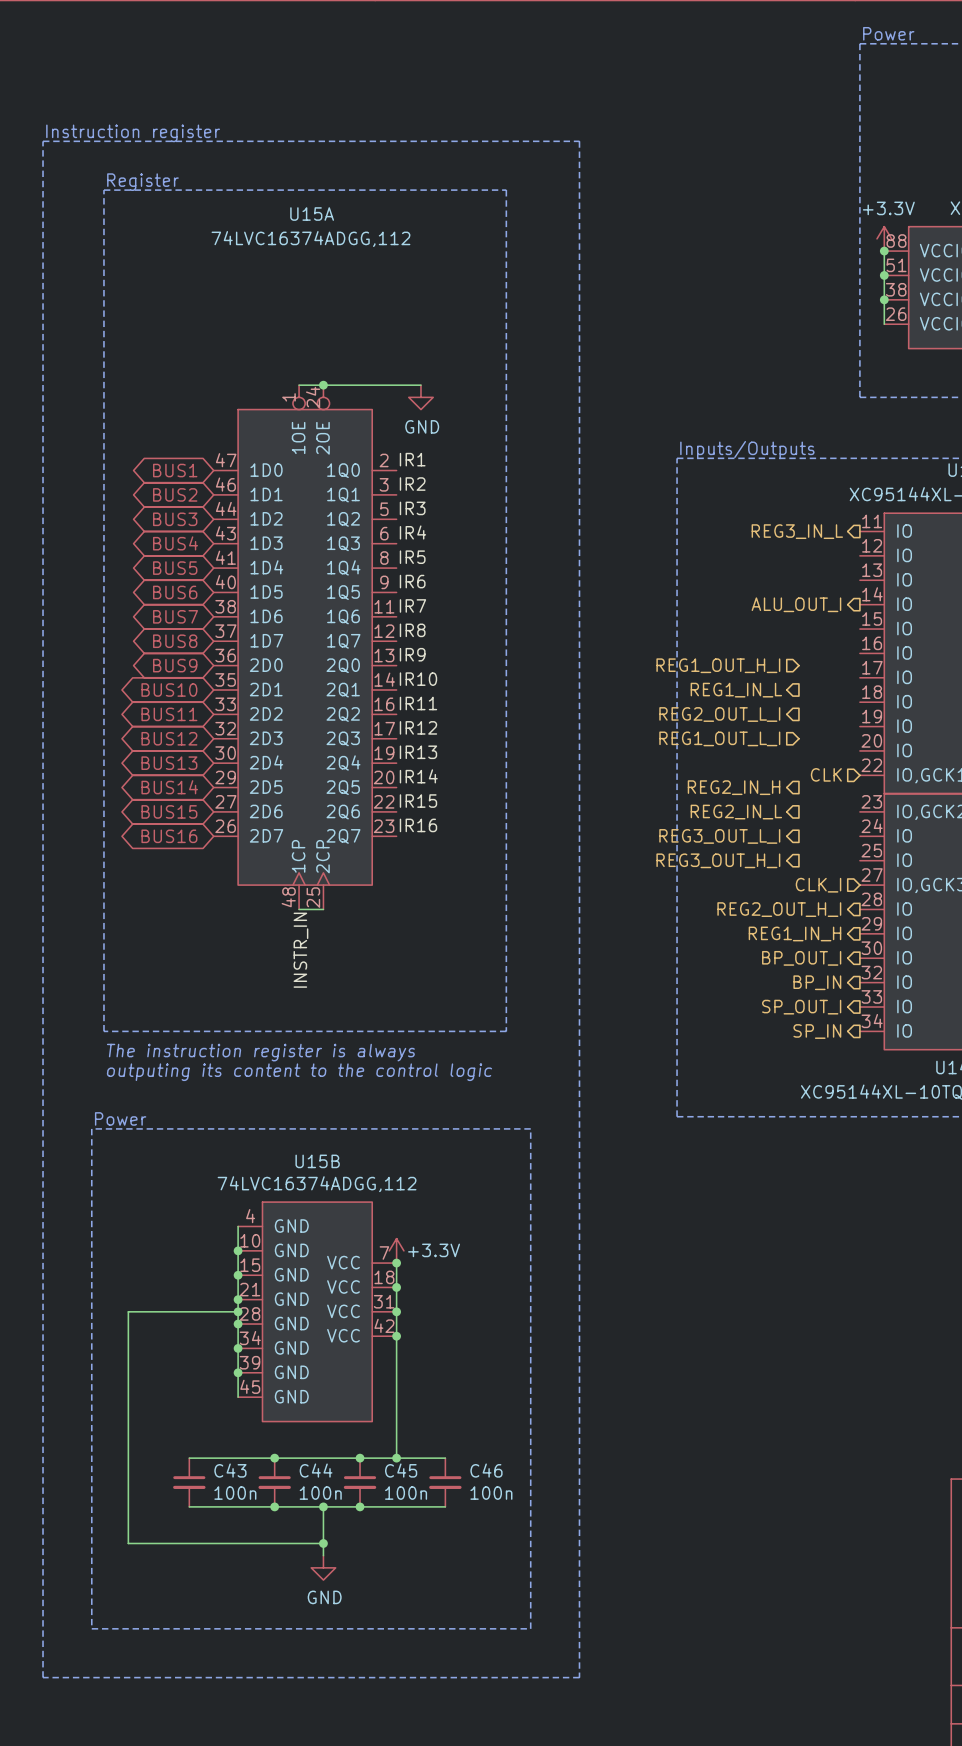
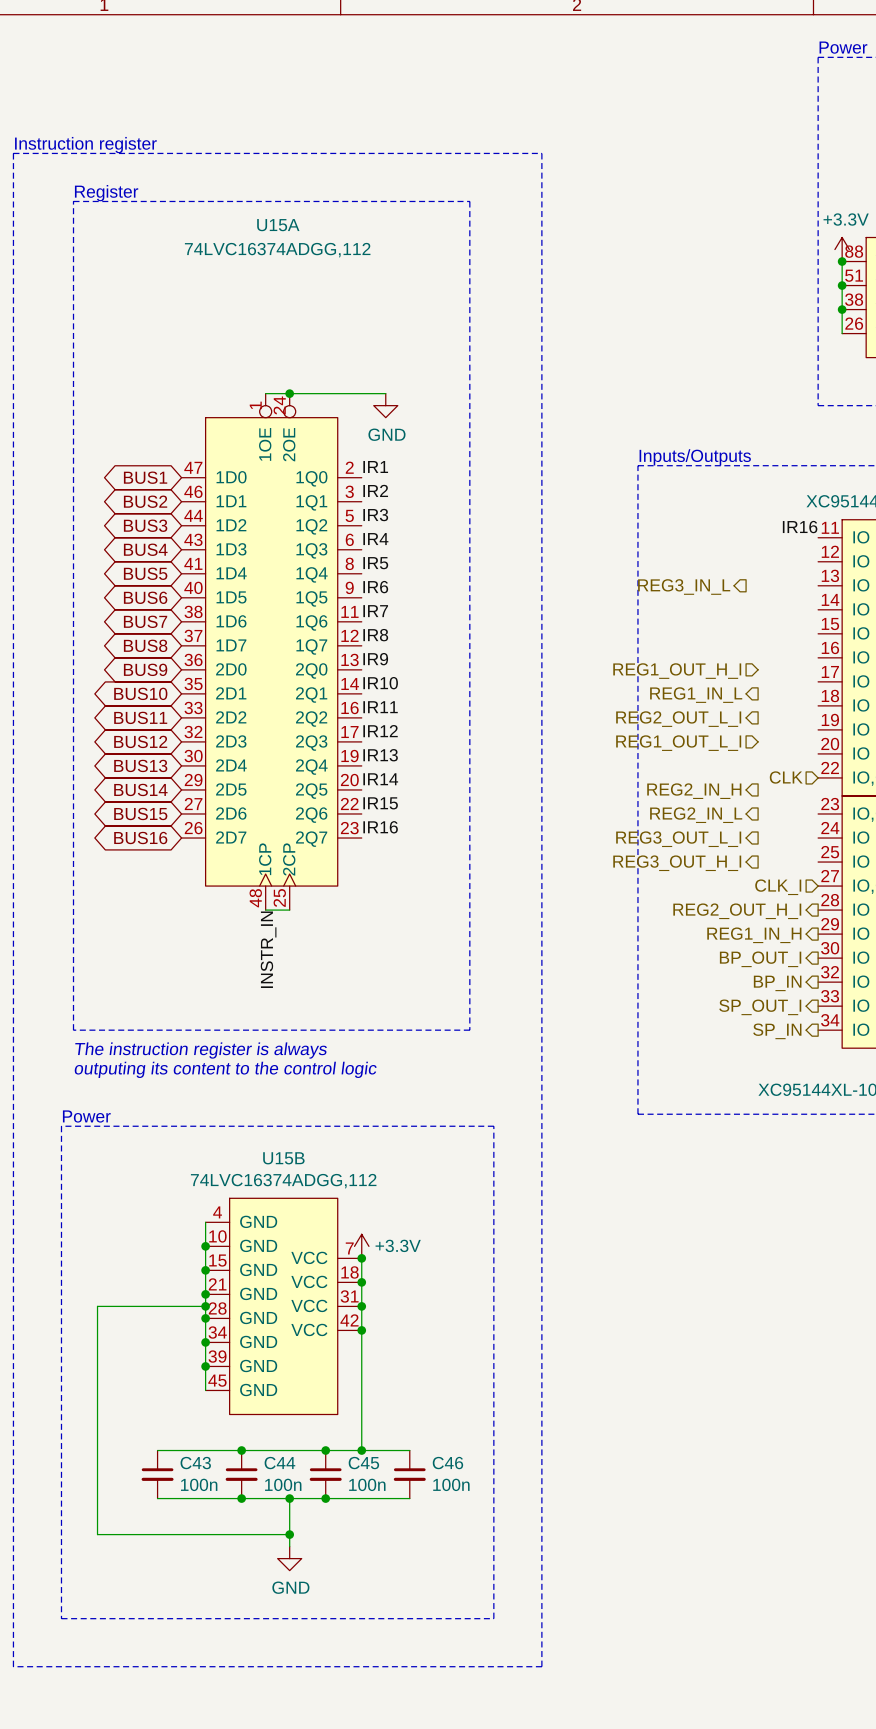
label: none -> IR16 (800, 527)
hierarchical label position: REG3_IN_L (797, 531) -> REG3_IN_L (684, 586)
hierarchical label: ALU_OUT_I (796, 604) -> none

